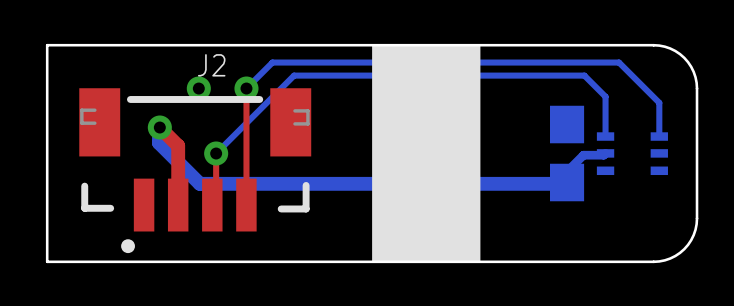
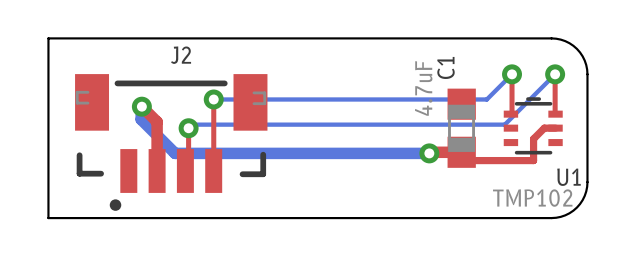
drawing: [372, 45, 481, 262] -> none
via: (198, 88) -> none
bottom track: (246, 88) (272, 62) (619, 62) (659, 102) (659, 136) -> none
top track: (246, 88) (246, 118) -> none
via: (246, 88) -> none
bottom track: none -> (512, 74) (486, 99) (213, 99)
top track: none -> (512, 74) (510, 114)
via: none -> (512, 74)
bottom track: none -> (555, 74) (504, 124) (185, 124)
top track: none -> (555, 74) (555, 114)
via: none -> (555, 74)
via: none -> (213, 99)
bottom track: (605, 136) (605, 96) (584, 75) (294, 75) (216, 153) -> none
C1 side: bottom (567, 153) -> top (461, 128)
bottom track: (605, 153) (603, 155) (583, 155) (567, 171) (567, 182) -> none
U1 side: bottom (632, 153) -> top (533, 125)
top track: none -> (555, 128) (544, 128) (533, 138) (533, 160) (469, 160) (461, 152) (429, 153)
bottom track: (567, 182) (506, 183) -> none
via: none -> (429, 153)

